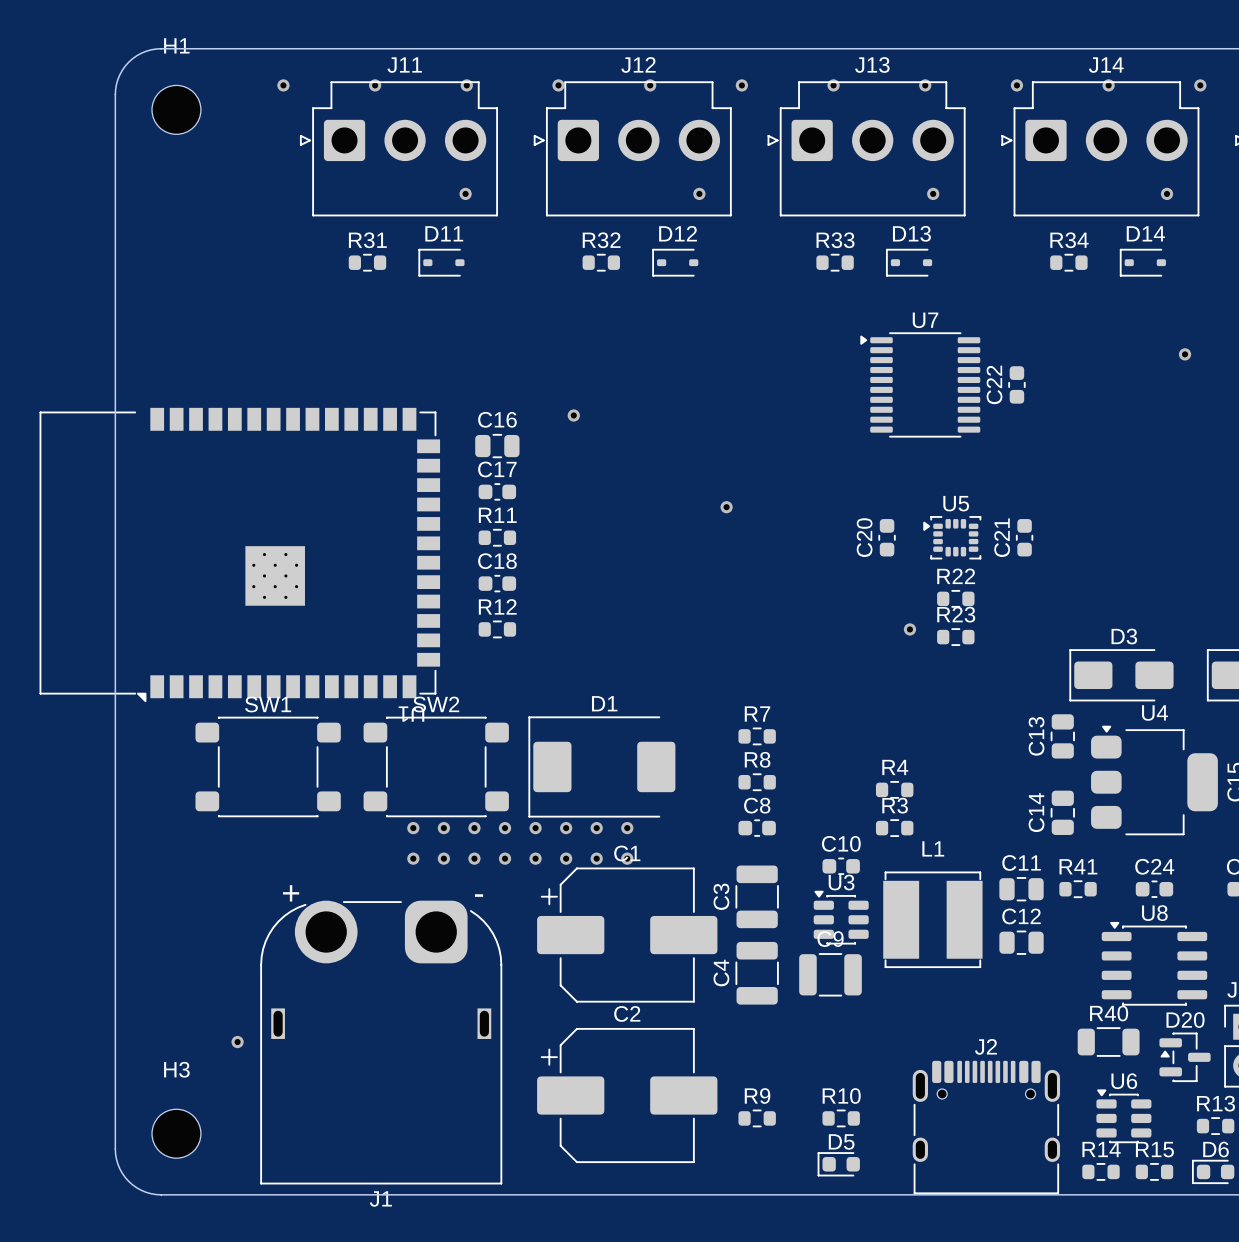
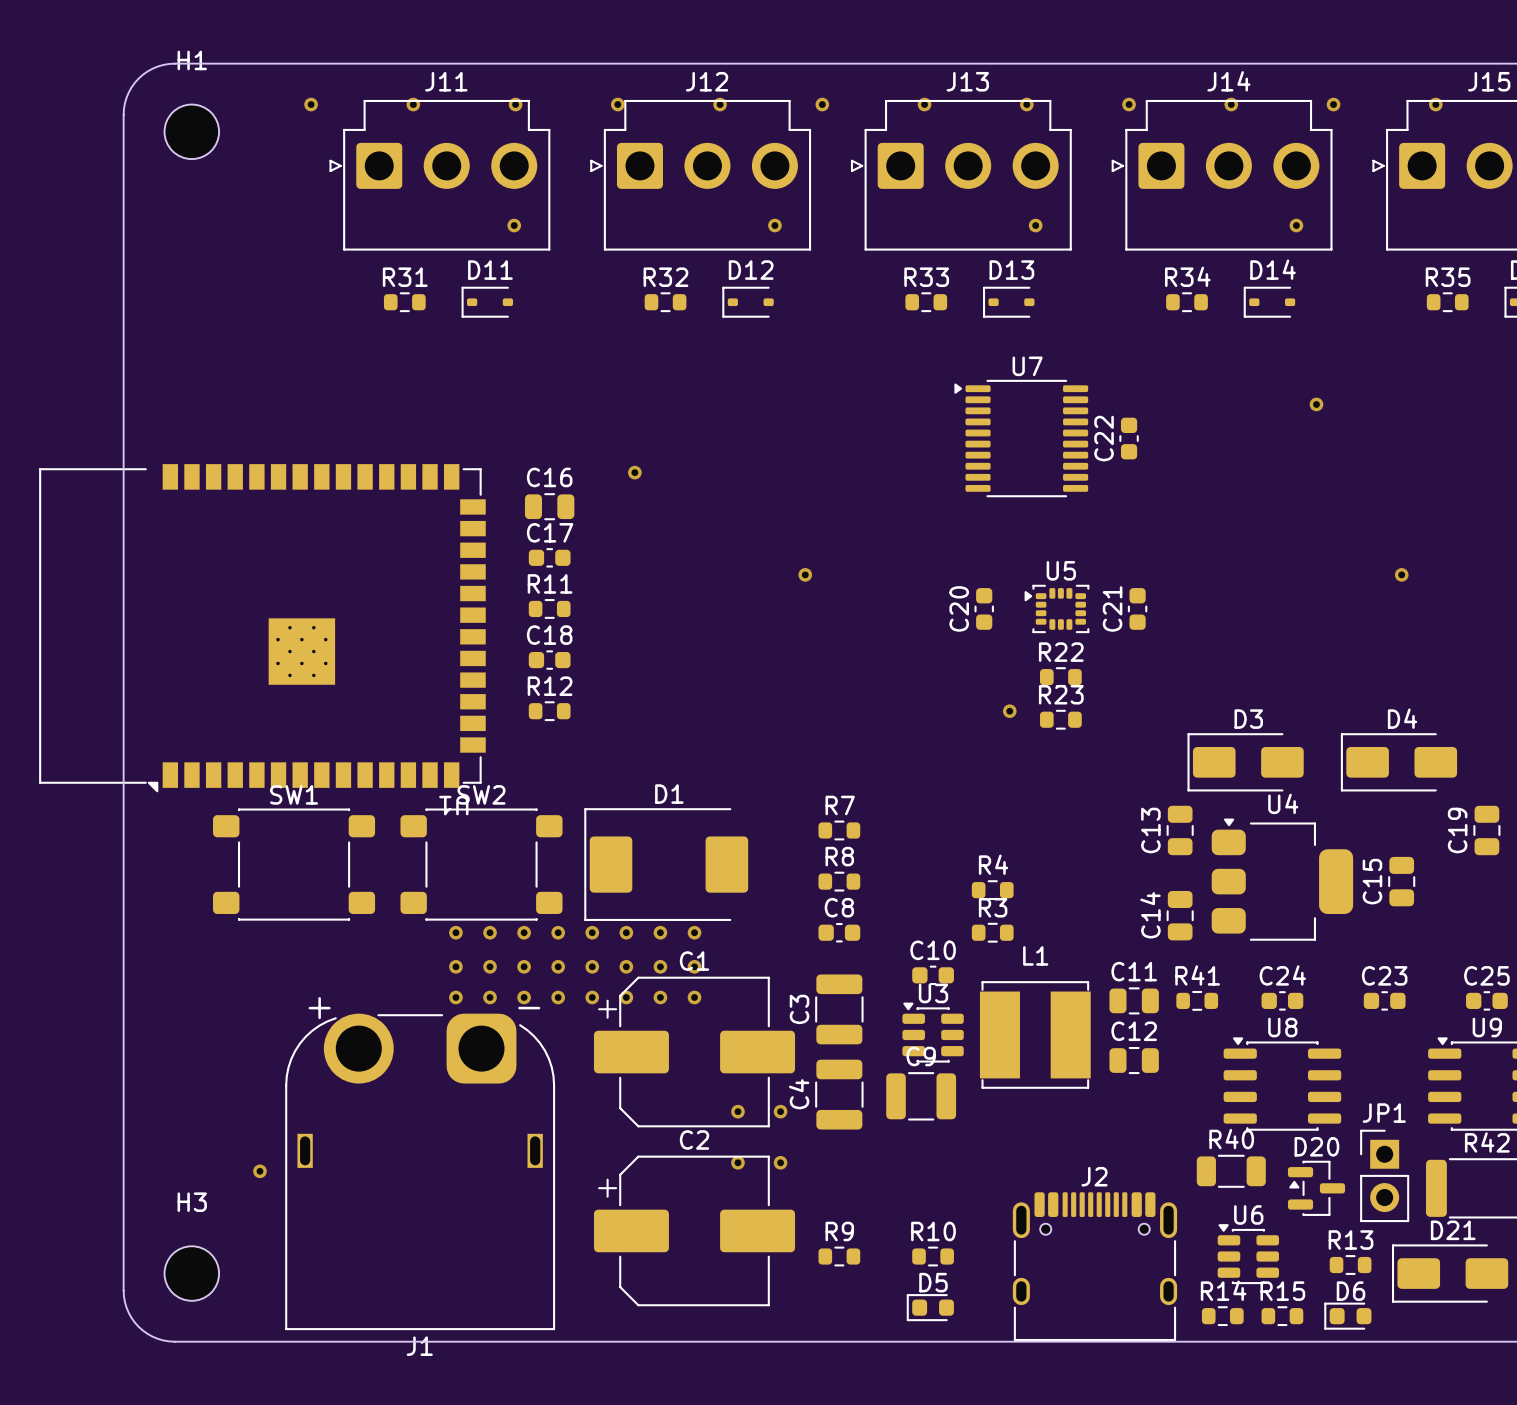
via: none -> (455, 997)
via: none -> (490, 997)
via: none -> (524, 997)
via: none -> (558, 997)
via: none -> (592, 997)
via: none -> (626, 997)
via: none -> (660, 997)
via: none -> (694, 997)
via: none -> (737, 1111)
via: none -> (780, 1111)
via: none -> (737, 1162)
via: none -> (780, 1162)

